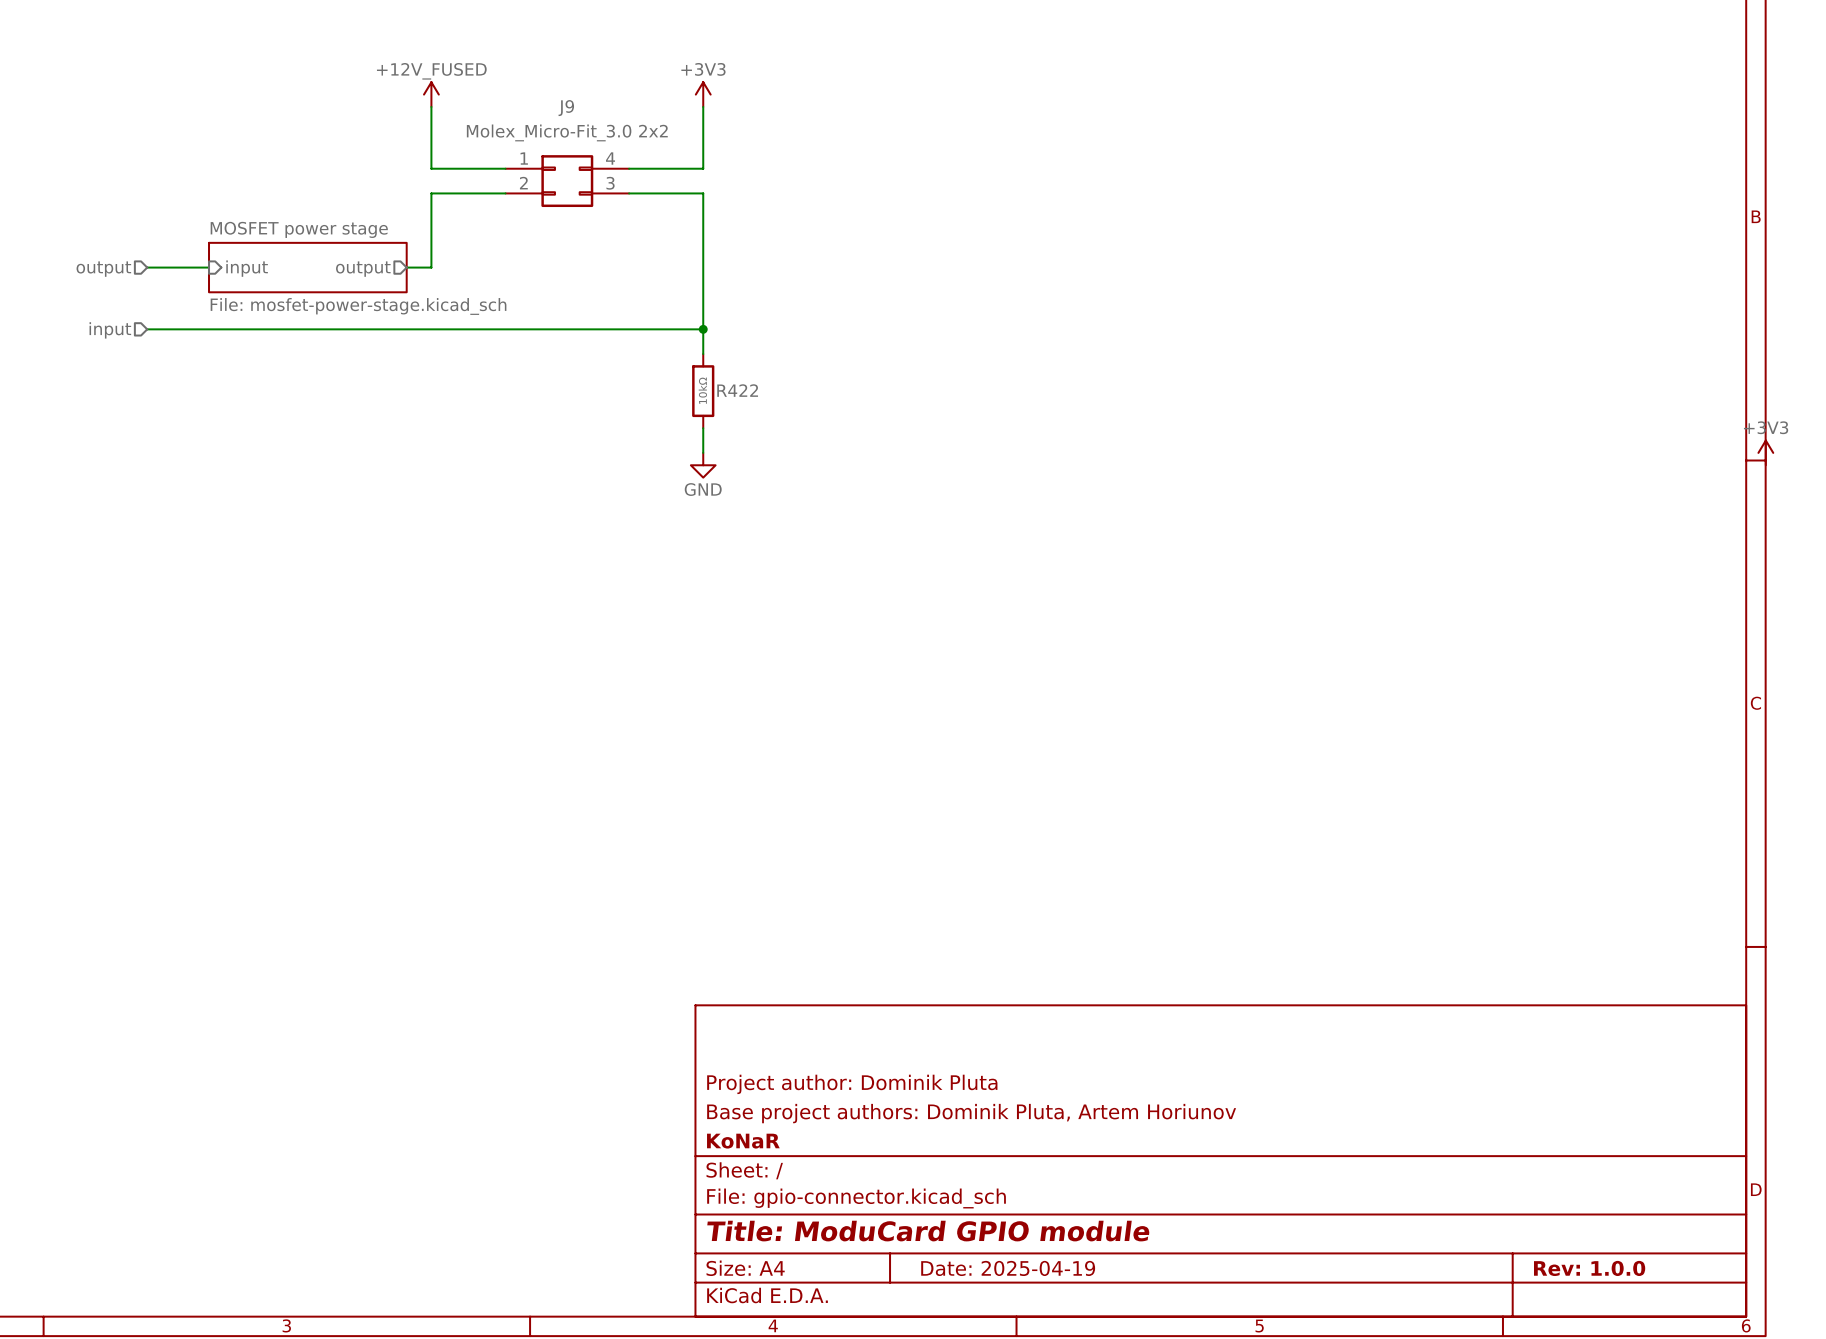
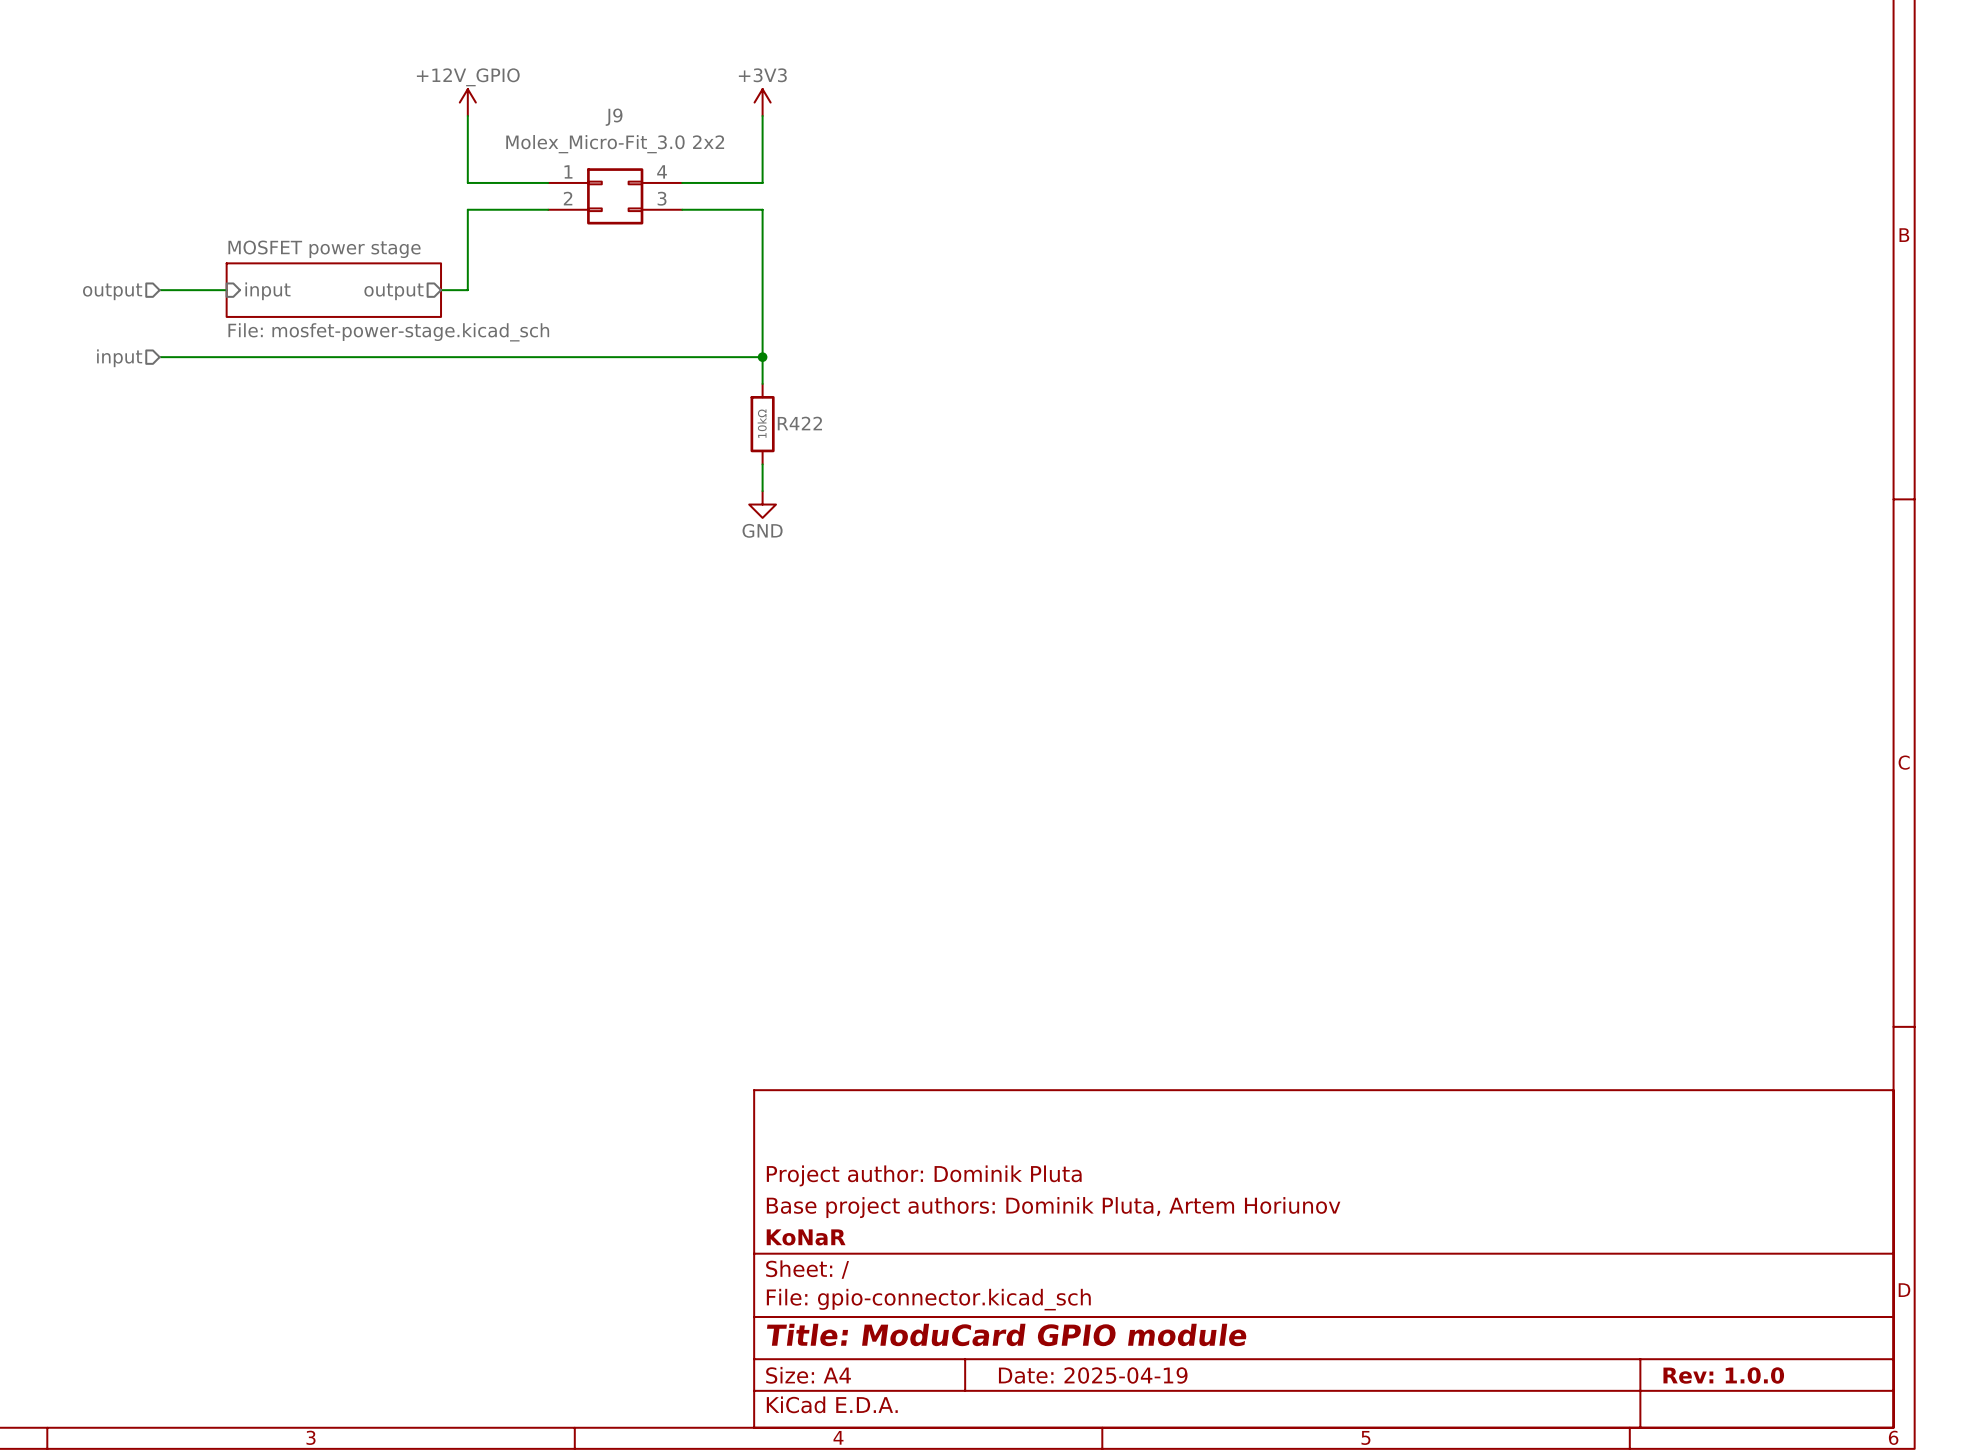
power symbol: +12V_FUSED (431, 94) -> +12V_GPIO (467, 102)
power symbol: +3V3 (1765, 452) -> none

